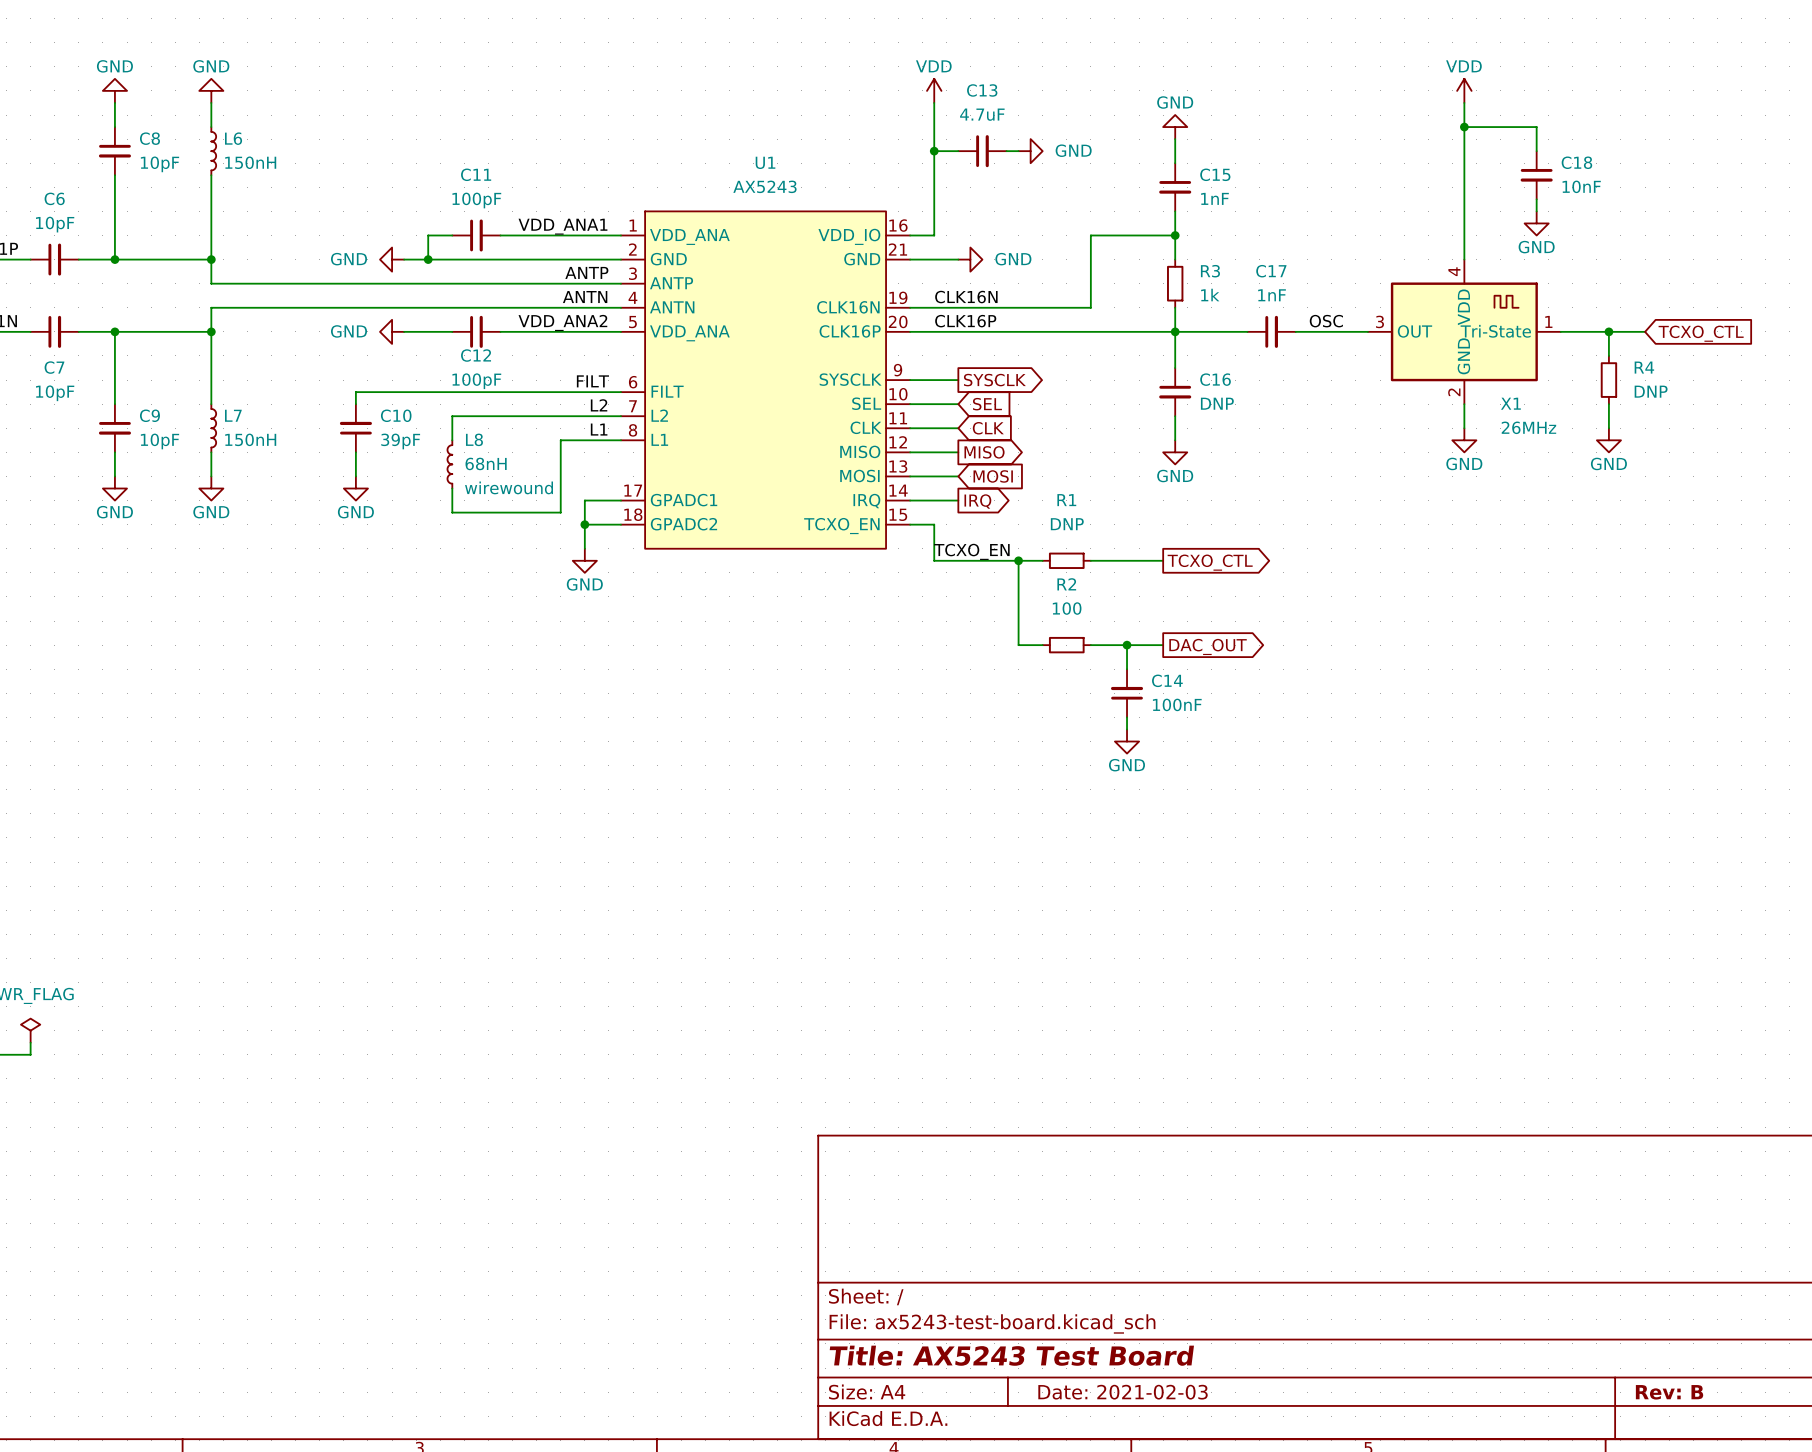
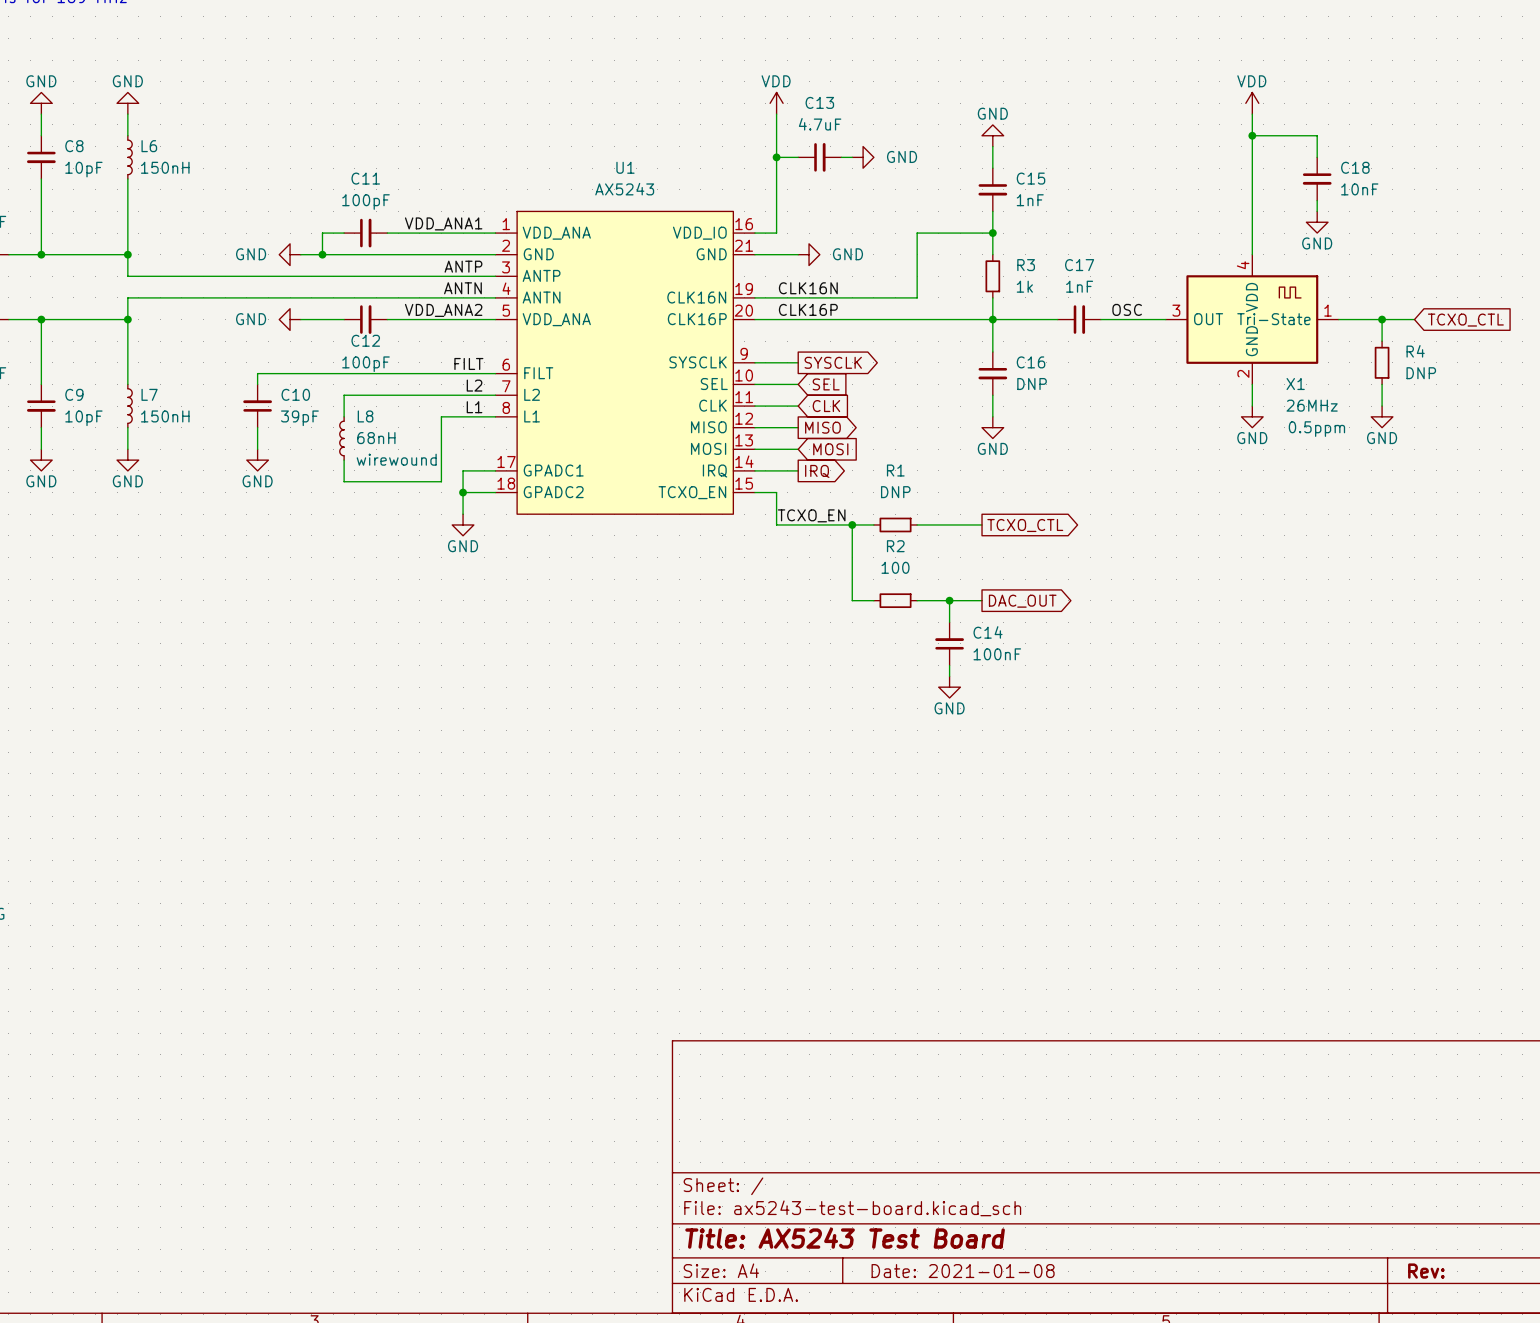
X1 text: none -> 0.5ppm (1316, 429)
title block: Date: 2021-02-03 (1123, 1392) -> Date: 2021-01-08 (963, 1271)
title block: Rev: B (1669, 1392) -> Rev: (1426, 1271)

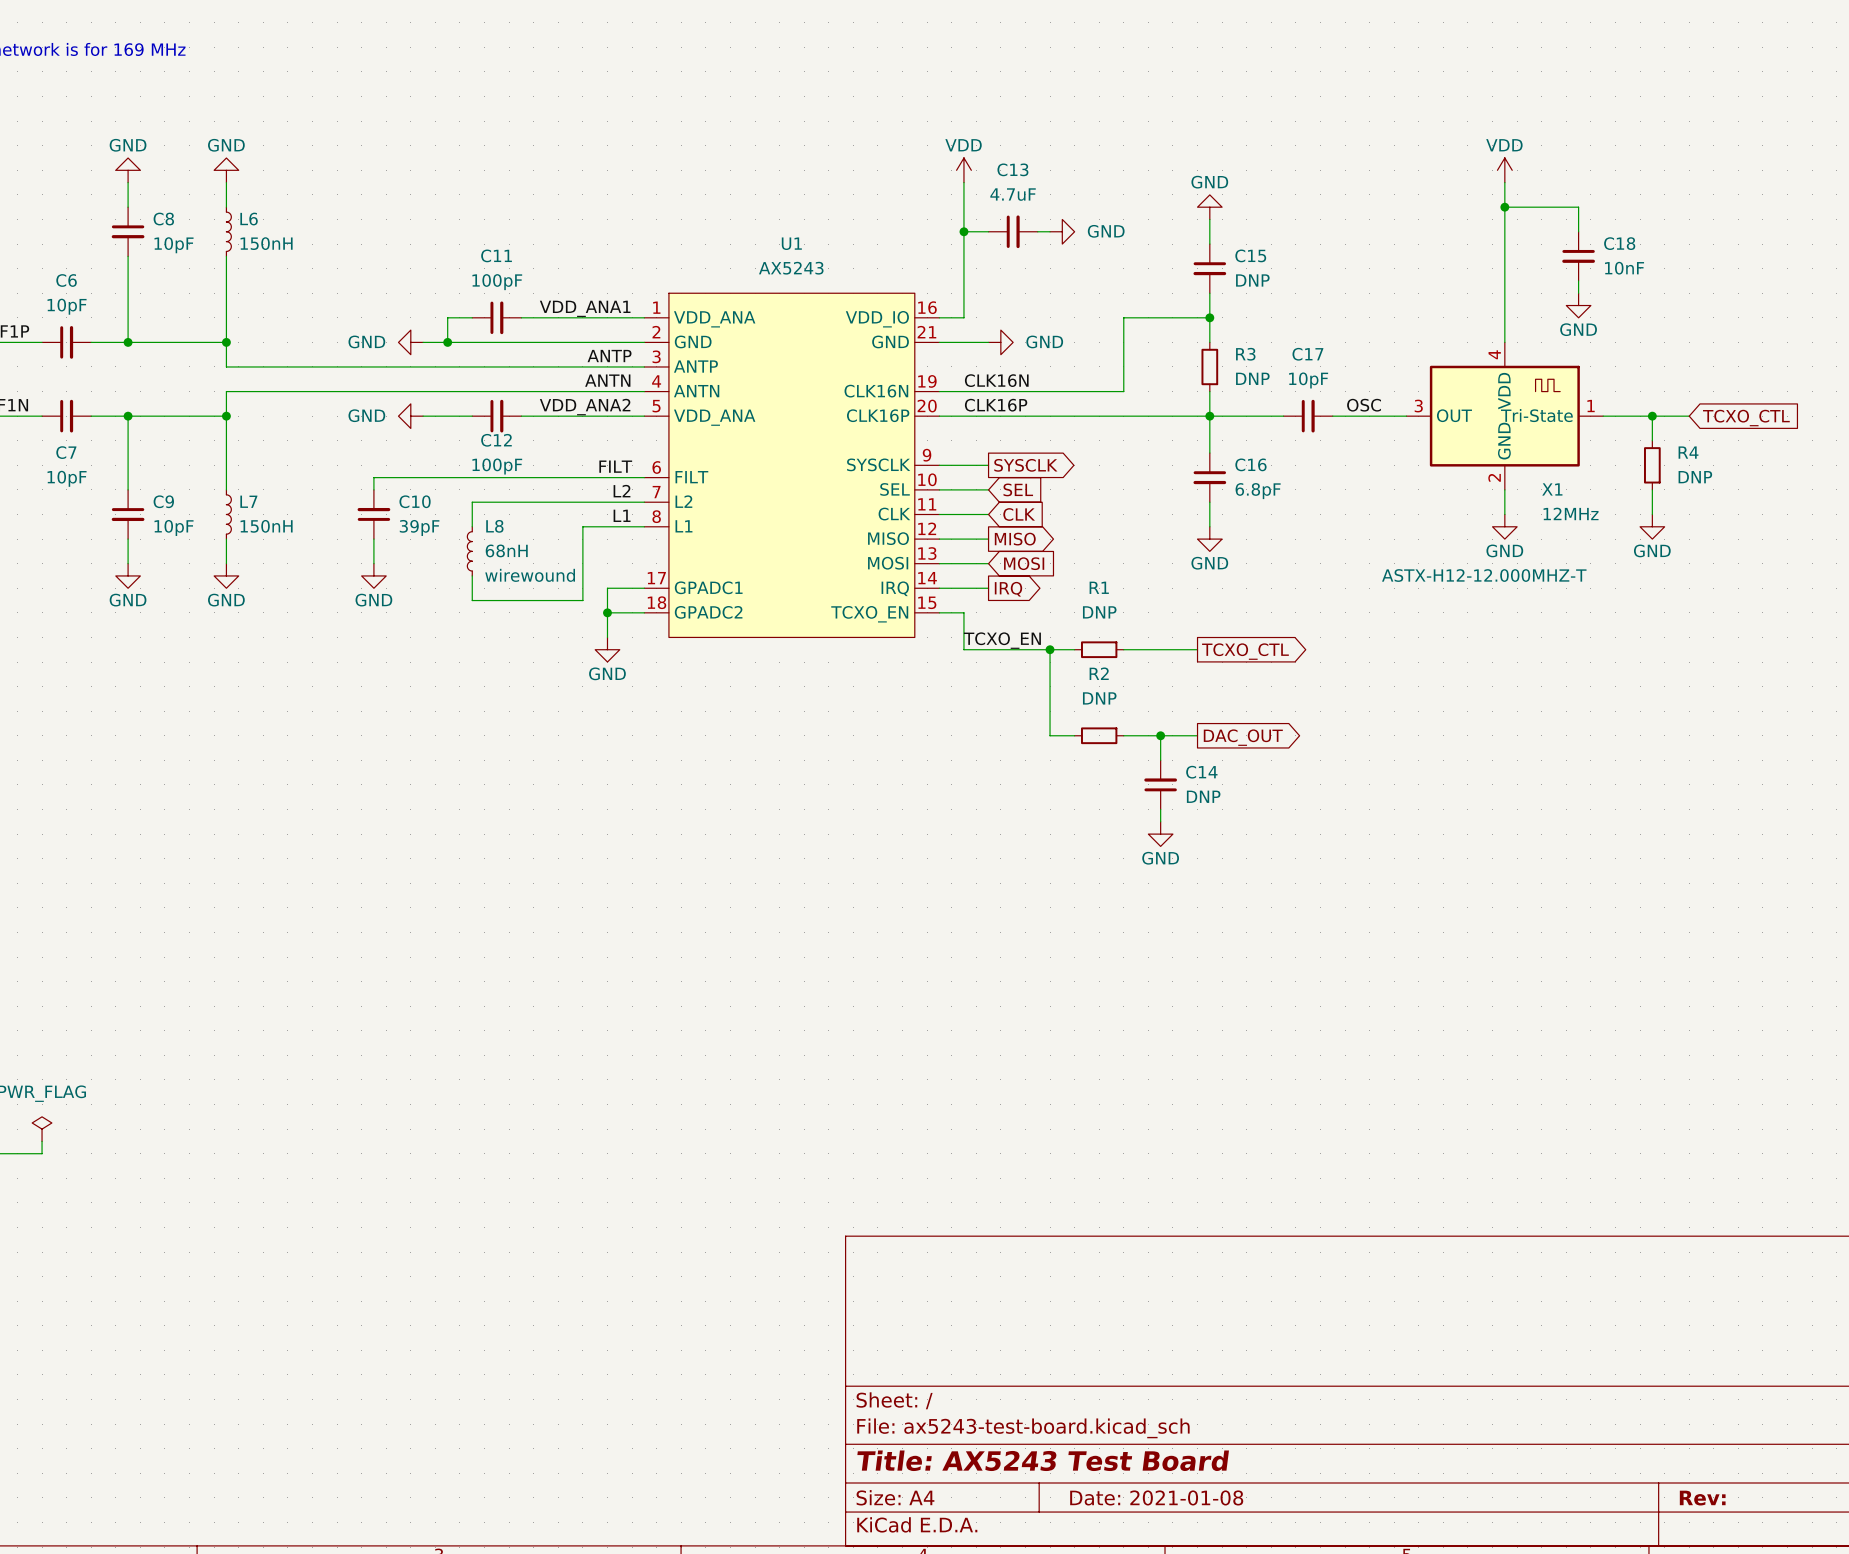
C15 value: 1nF (1030, 200) -> DNP (1252, 280)
R3 value: 1k (1024, 286) -> DNP (1252, 378)
C17 value: 1nF (1079, 286) -> 10pF (1308, 380)
C16 value: DNP (1032, 384) -> 6.8pF (1258, 491)
X1 value: 26MHz (1312, 405) -> 12MHz (1571, 513)
X1 text: 0.5ppm (1316, 429) -> none
X1 text: none -> ASTX-H12-12.000MHZ-T (1484, 575)
R2 value: 100 (895, 567) -> DNP (1099, 698)
C14 value: 100nF (997, 654) -> DNP (1203, 796)

